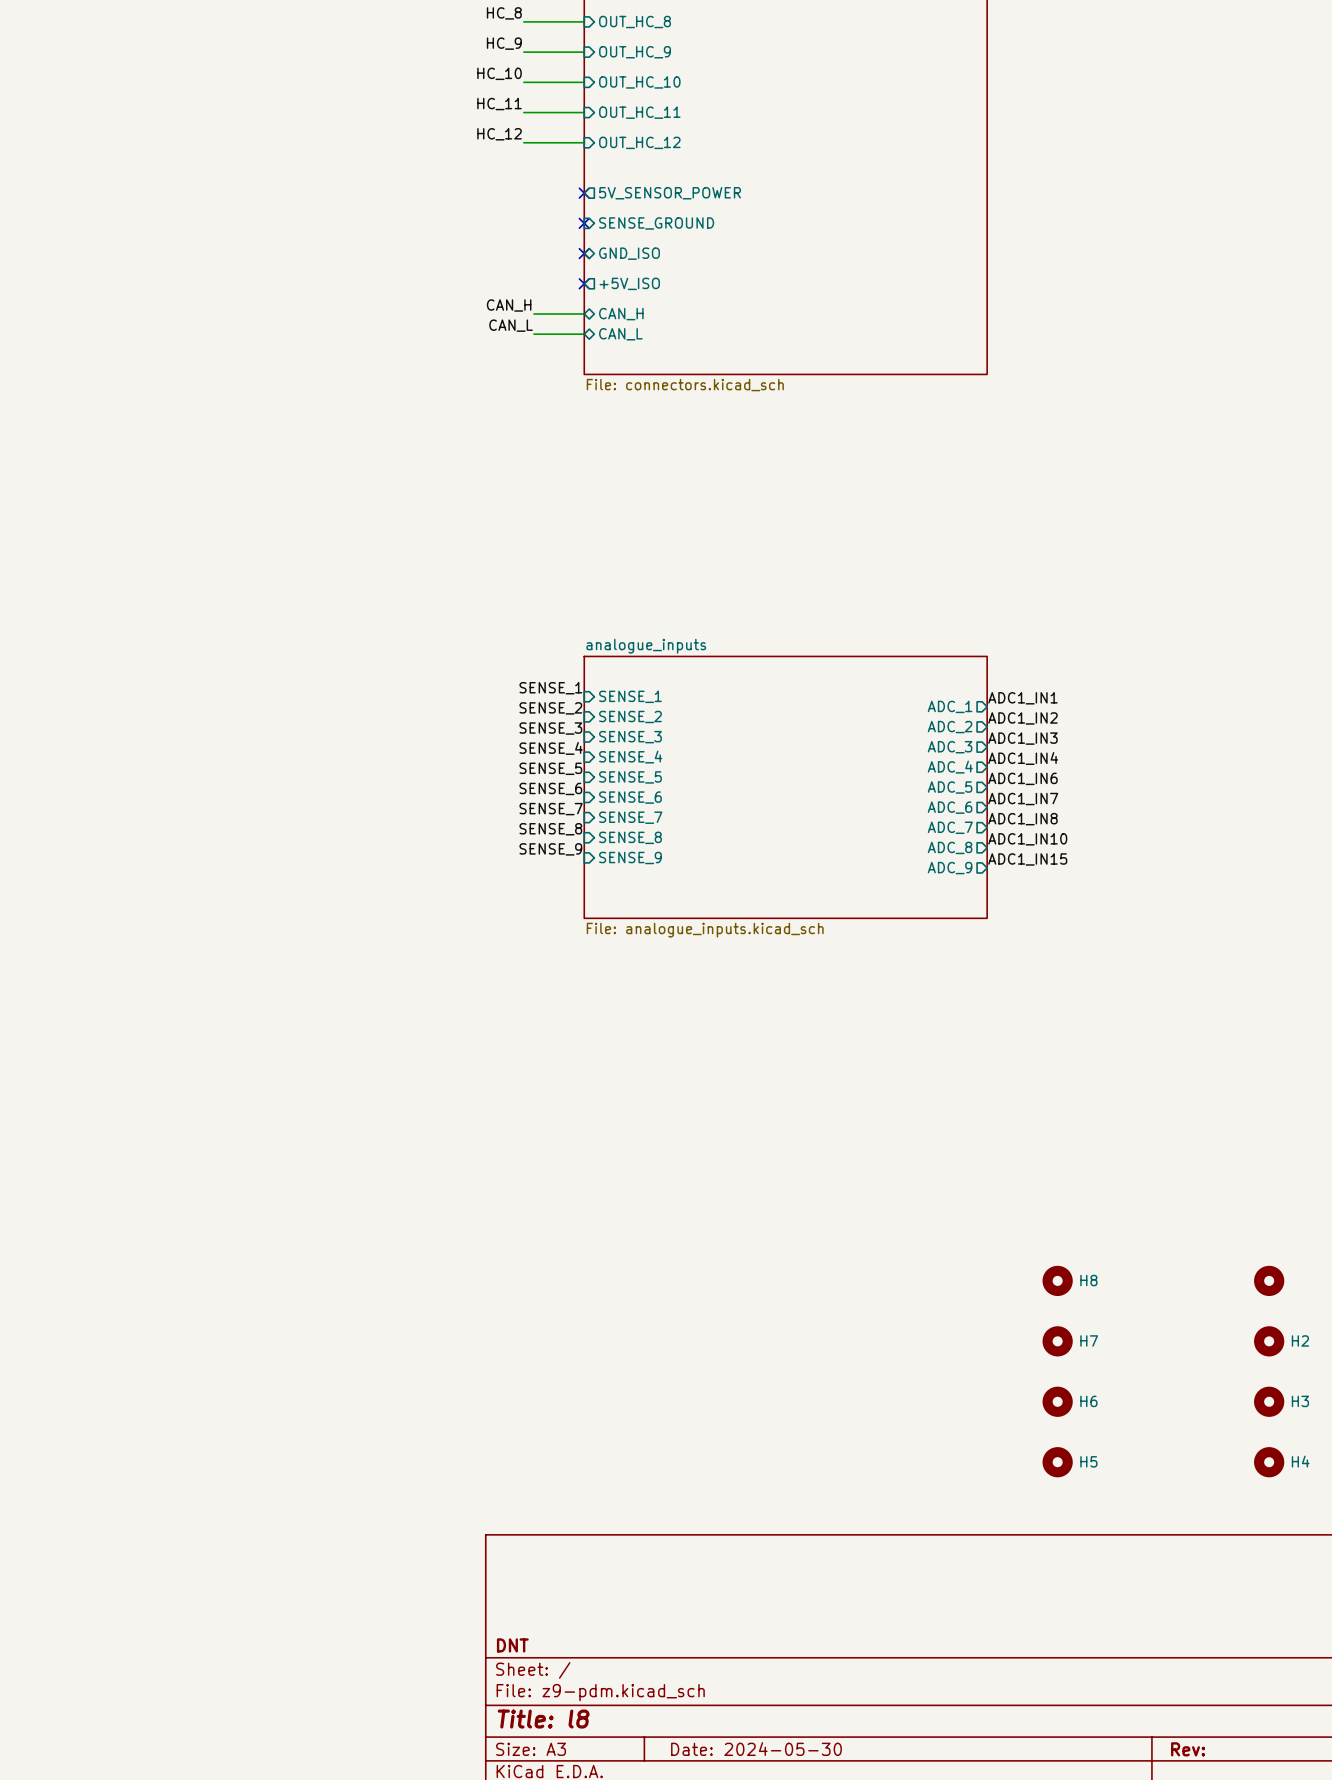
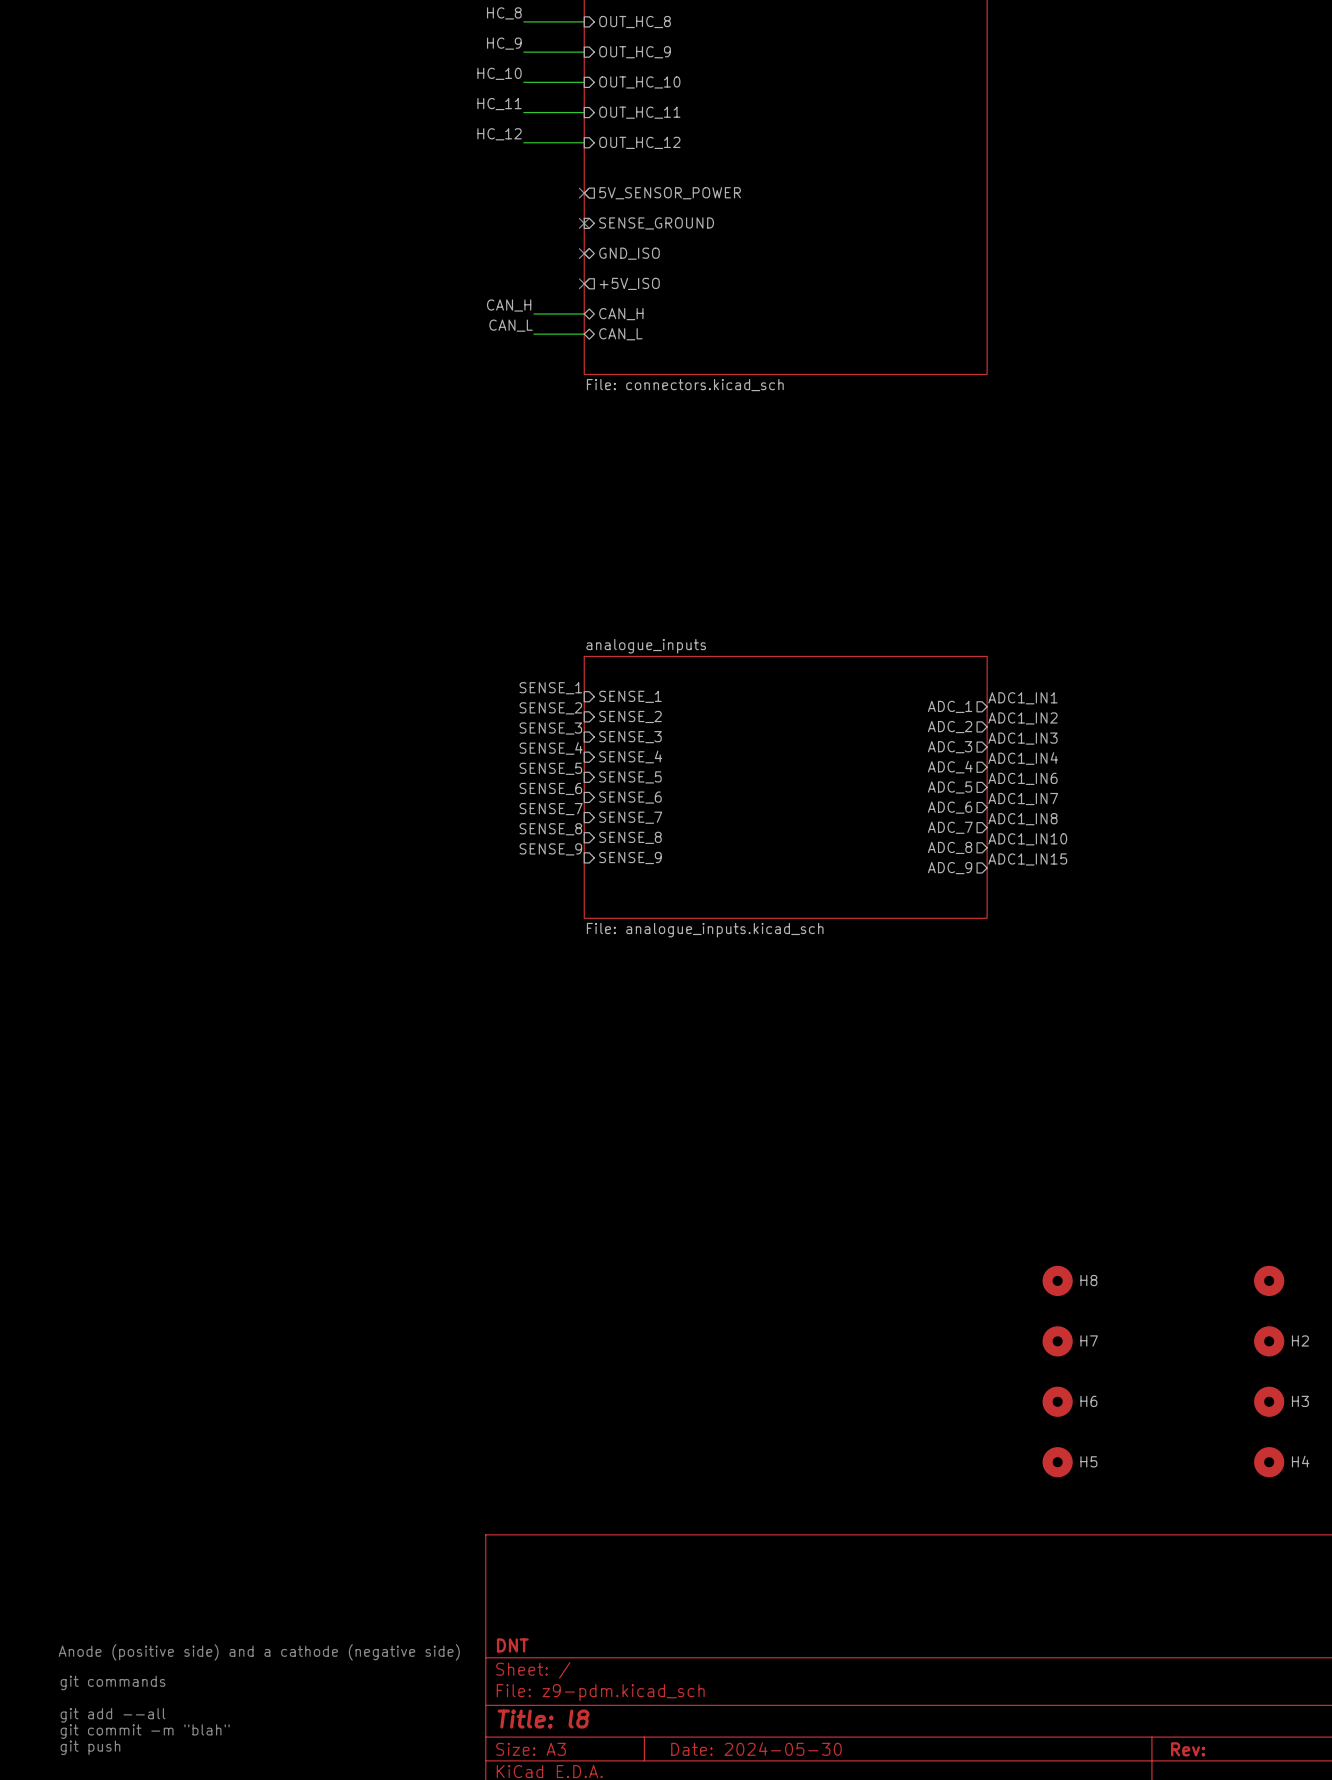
text: none -> Anode (positive side) and a cathode (negative side) (259, 1652)
text: none -> git commands (113, 1682)
text: none -> git add --all (113, 1715)
text: none -> git commit -m "blah" (145, 1731)
text: none -> git push (90, 1747)

